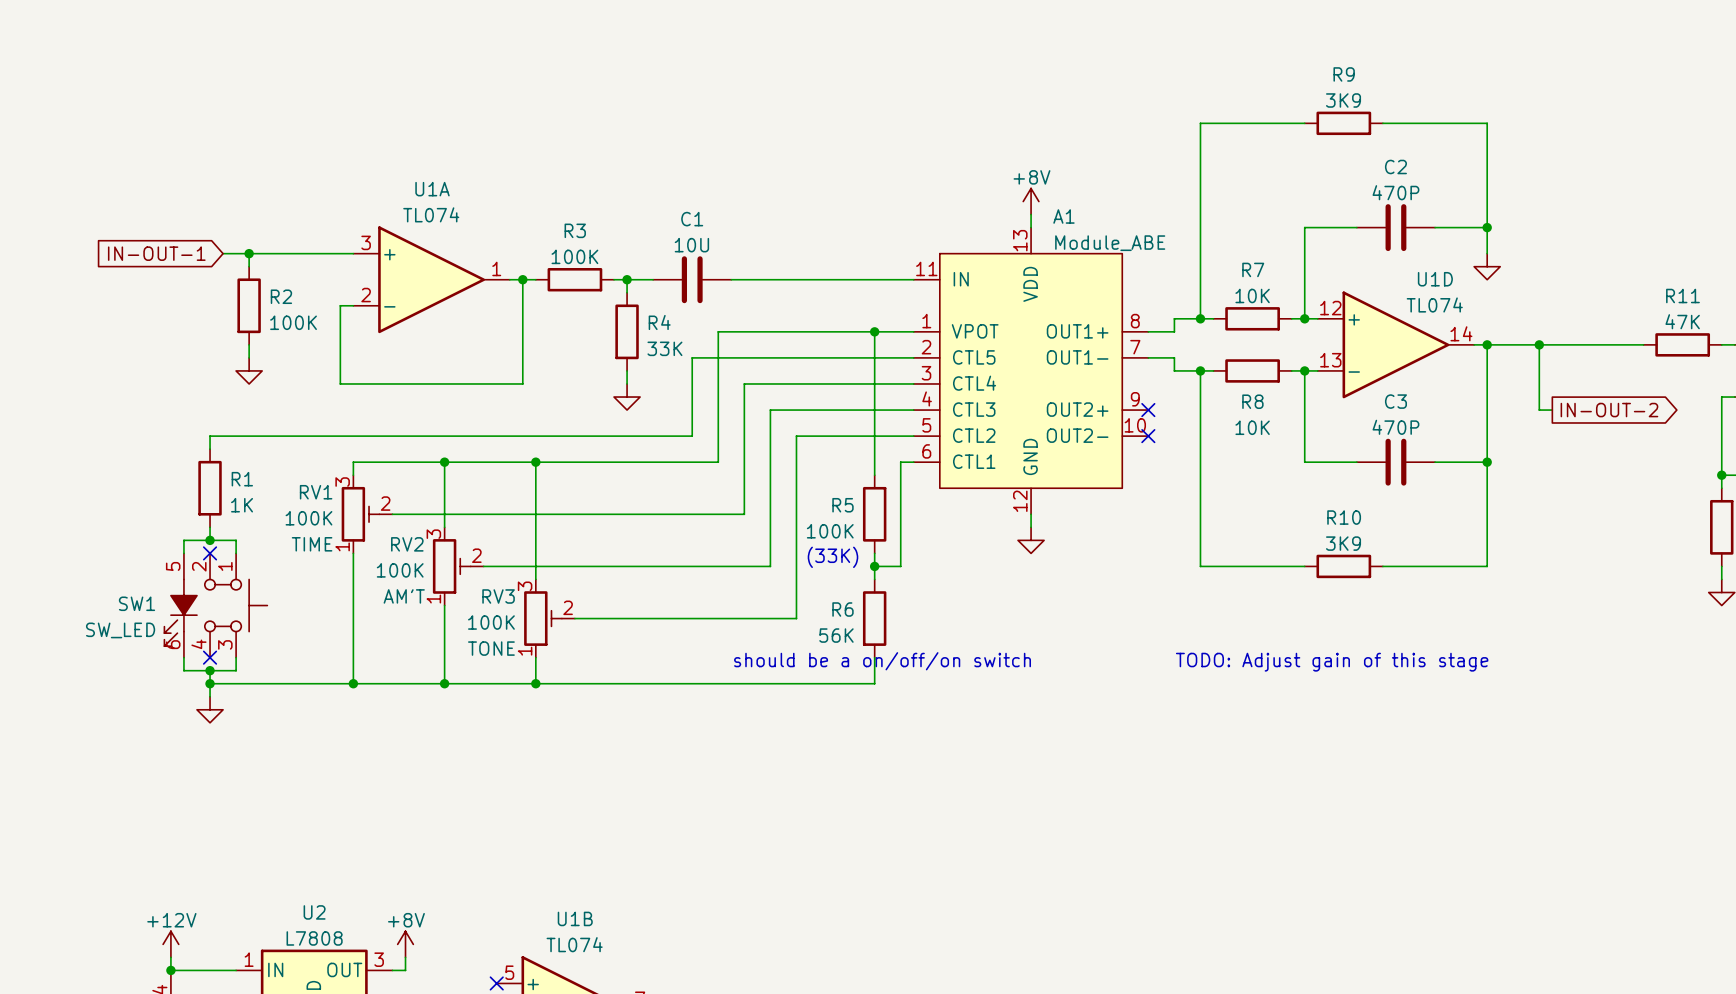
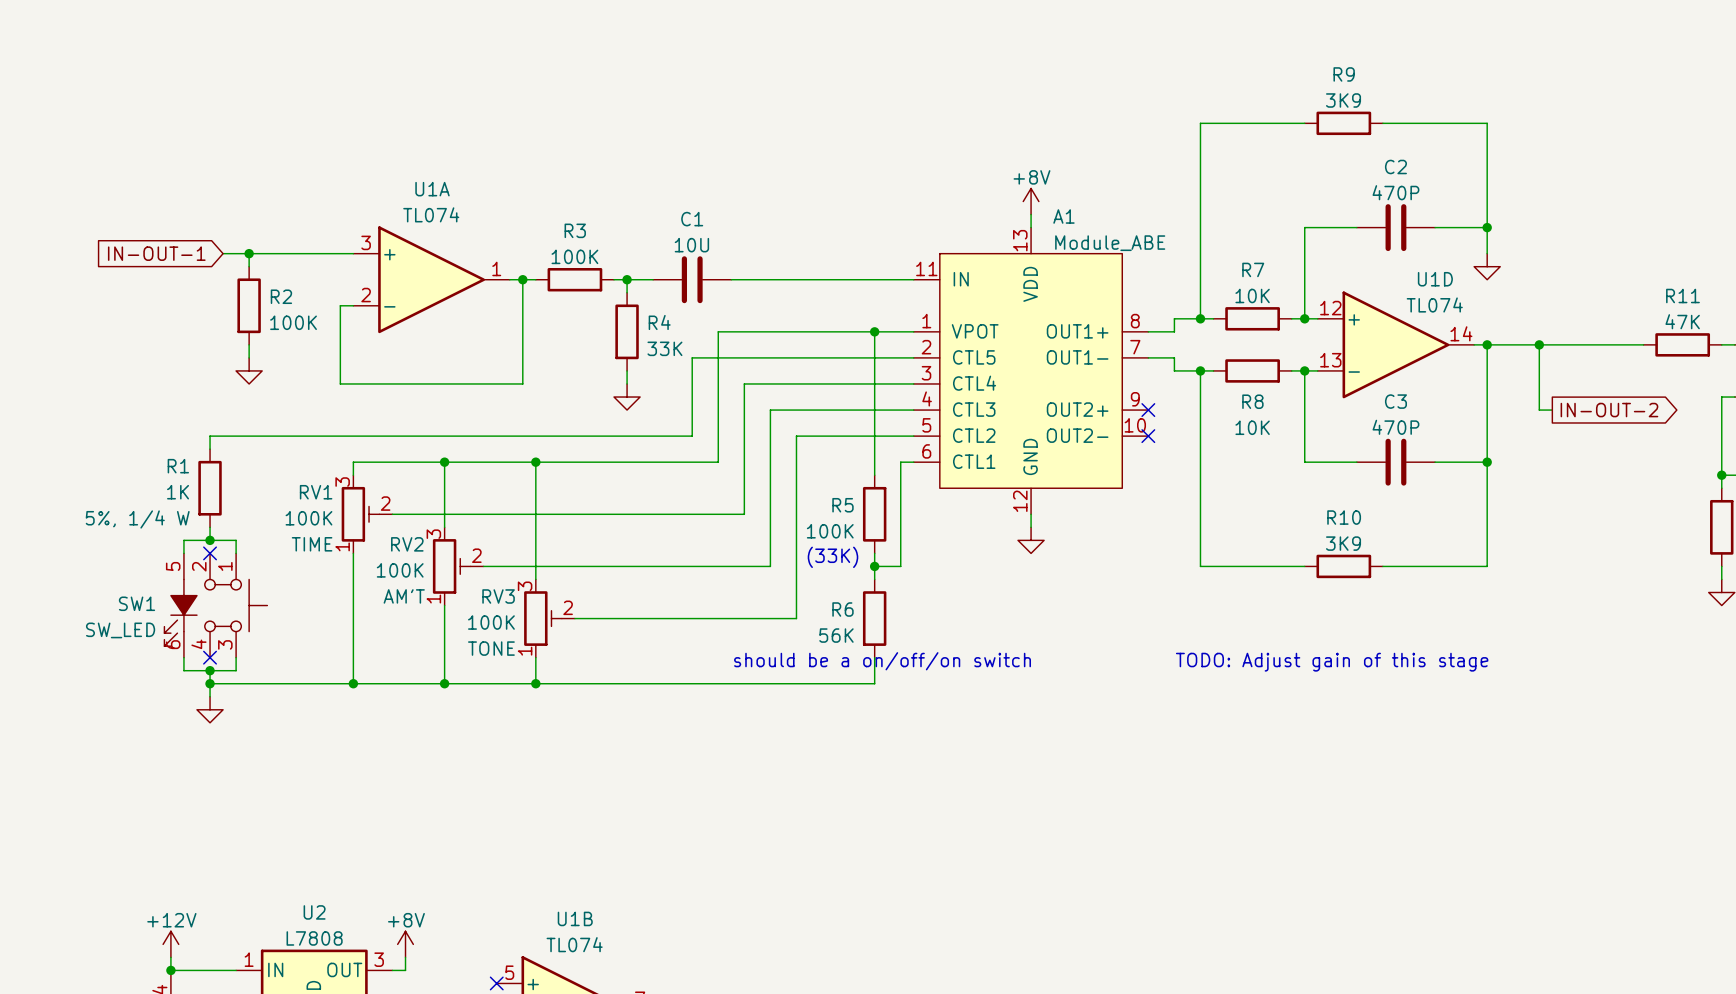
R1 name position: R1 (242, 479) -> R1 (178, 466)
R1 value position: 1K (242, 505) -> 1K (178, 492)
R1 text: none -> 5%, 1/4 W (137, 519)

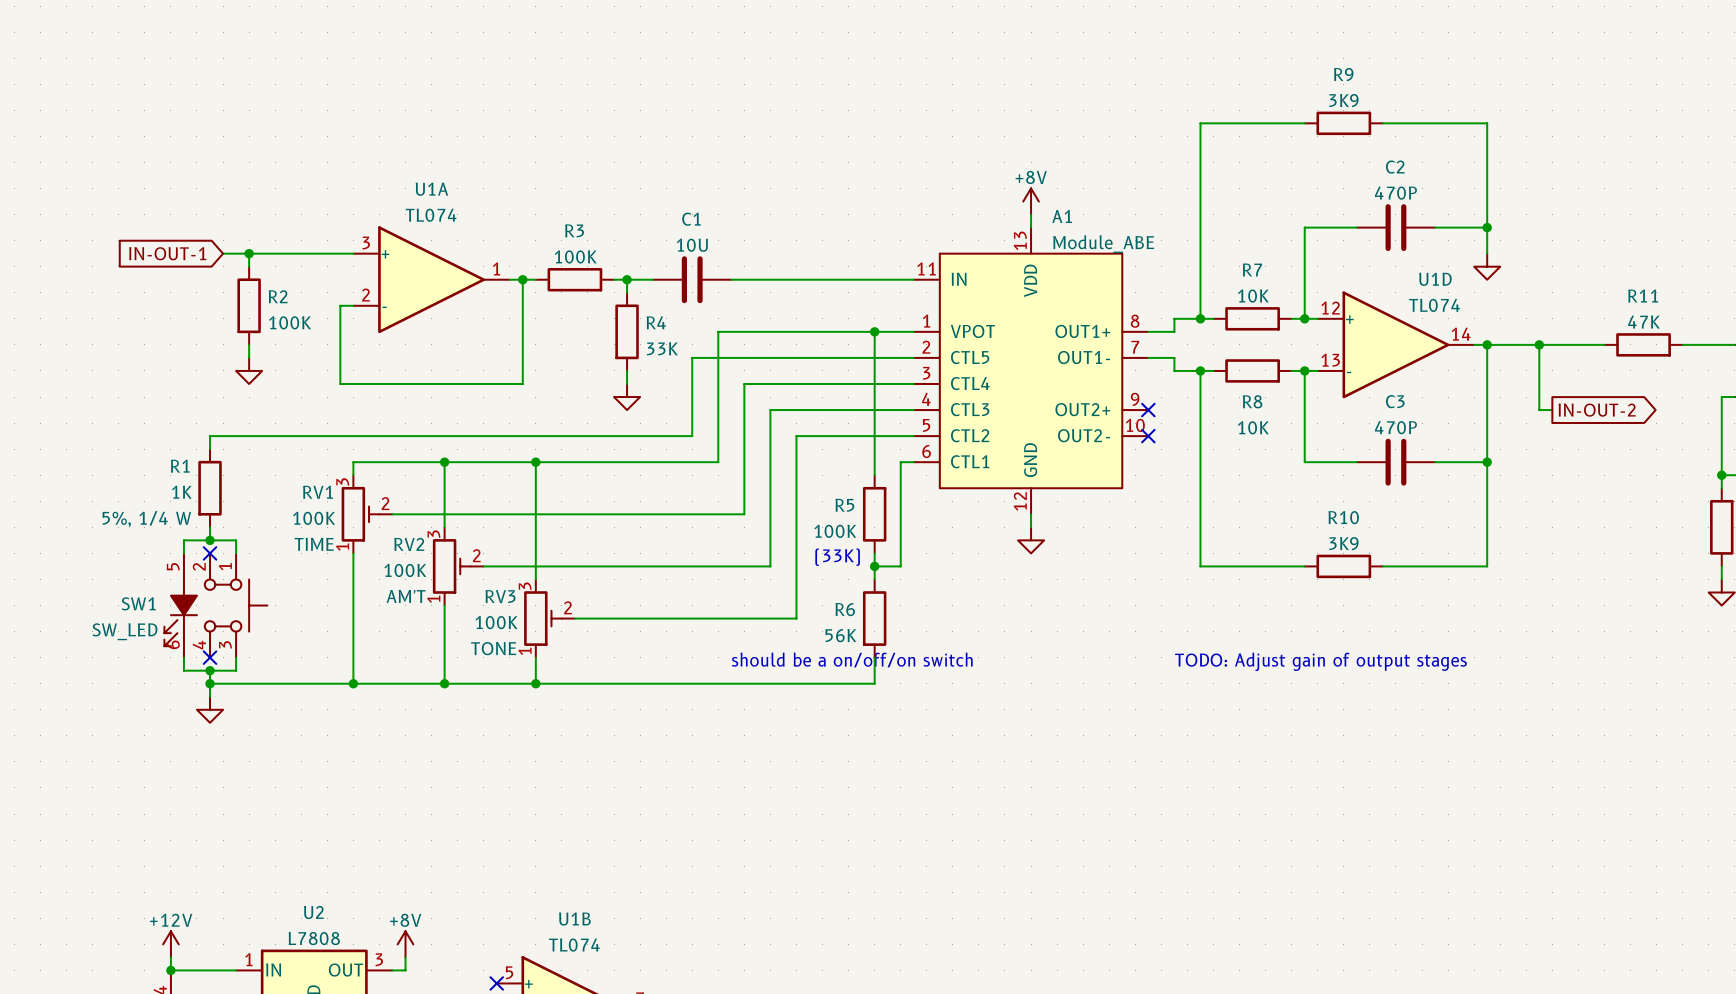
wire: (1604, 344) (1643, 344) -> (1682, 344) (1721, 344)
R11 position: (1682, 344) -> (1643, 344)
text: TODO: Adjust gain of this stage (1332, 662) -> TODO: Adjust gain of output stages (1320, 661)

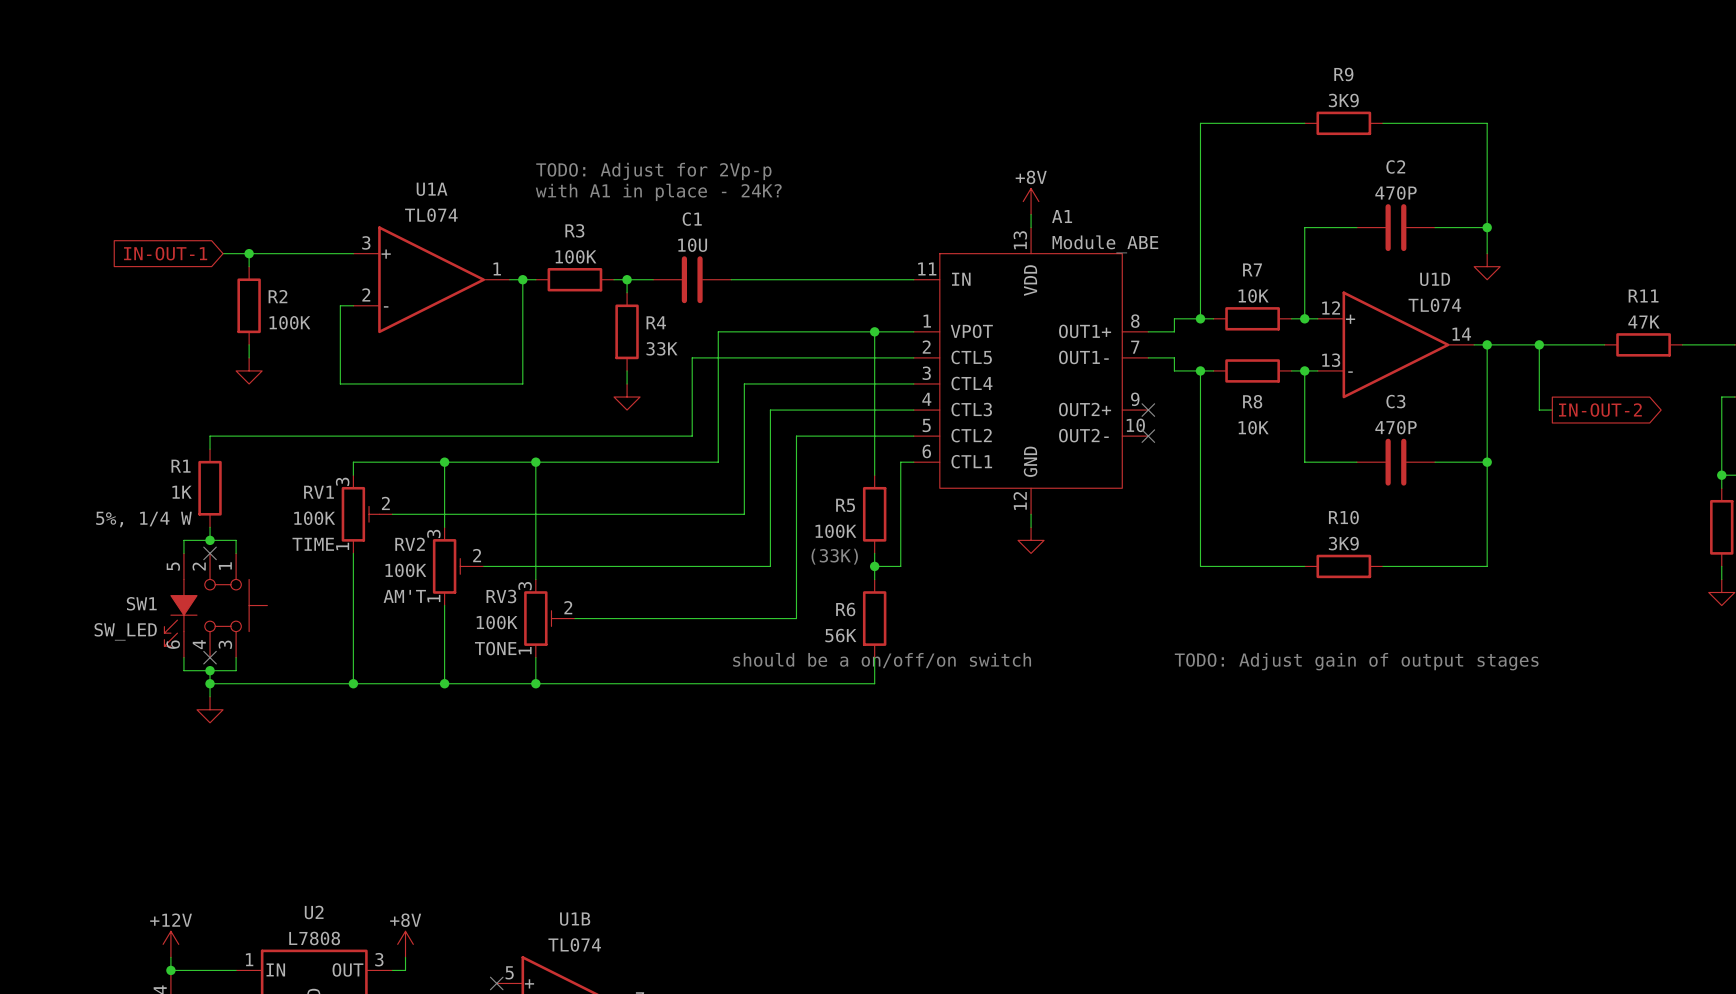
text: none -> TODO: Adjust for 2Vp-p (653, 171)
text: none -> with A1 in place - 24K? (658, 192)

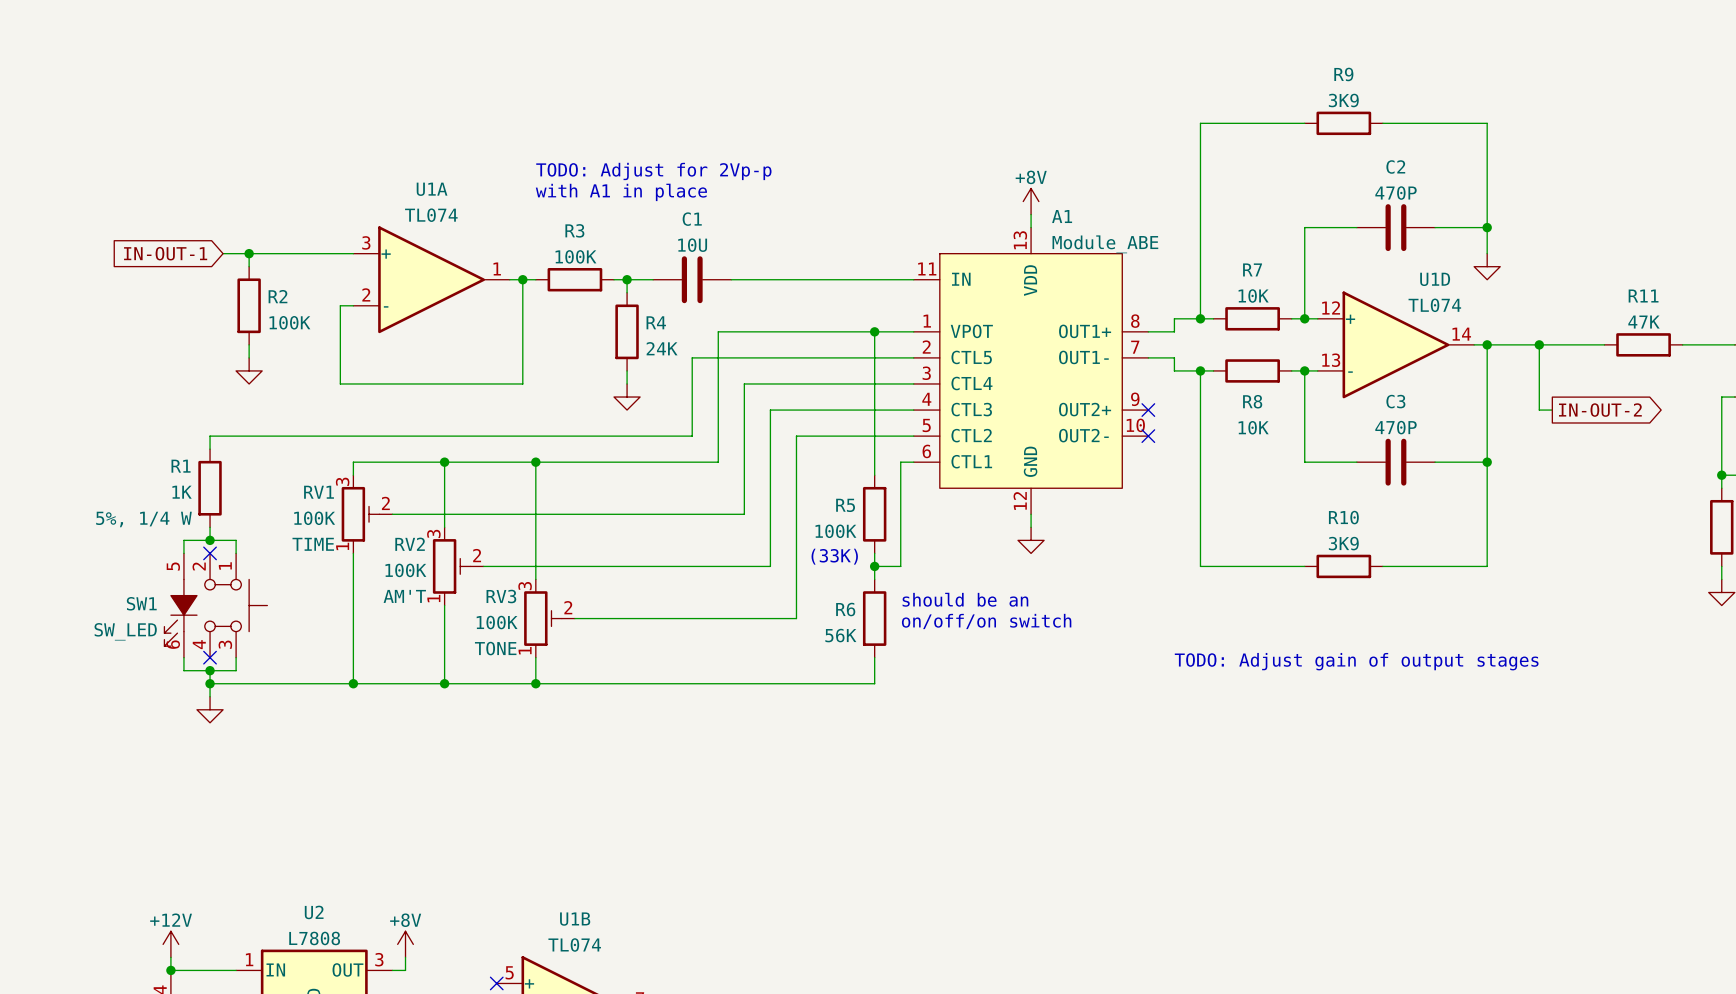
text: with A1 in place - 24K? (658, 192) -> with A1 in place (621, 192)
R4 value: 33K (662, 348) -> 24K (662, 348)
text: none -> should be an (965, 599)
text: none -> on/off/on switch (986, 621)
text: should be a on/off/on switch (882, 660) -> none

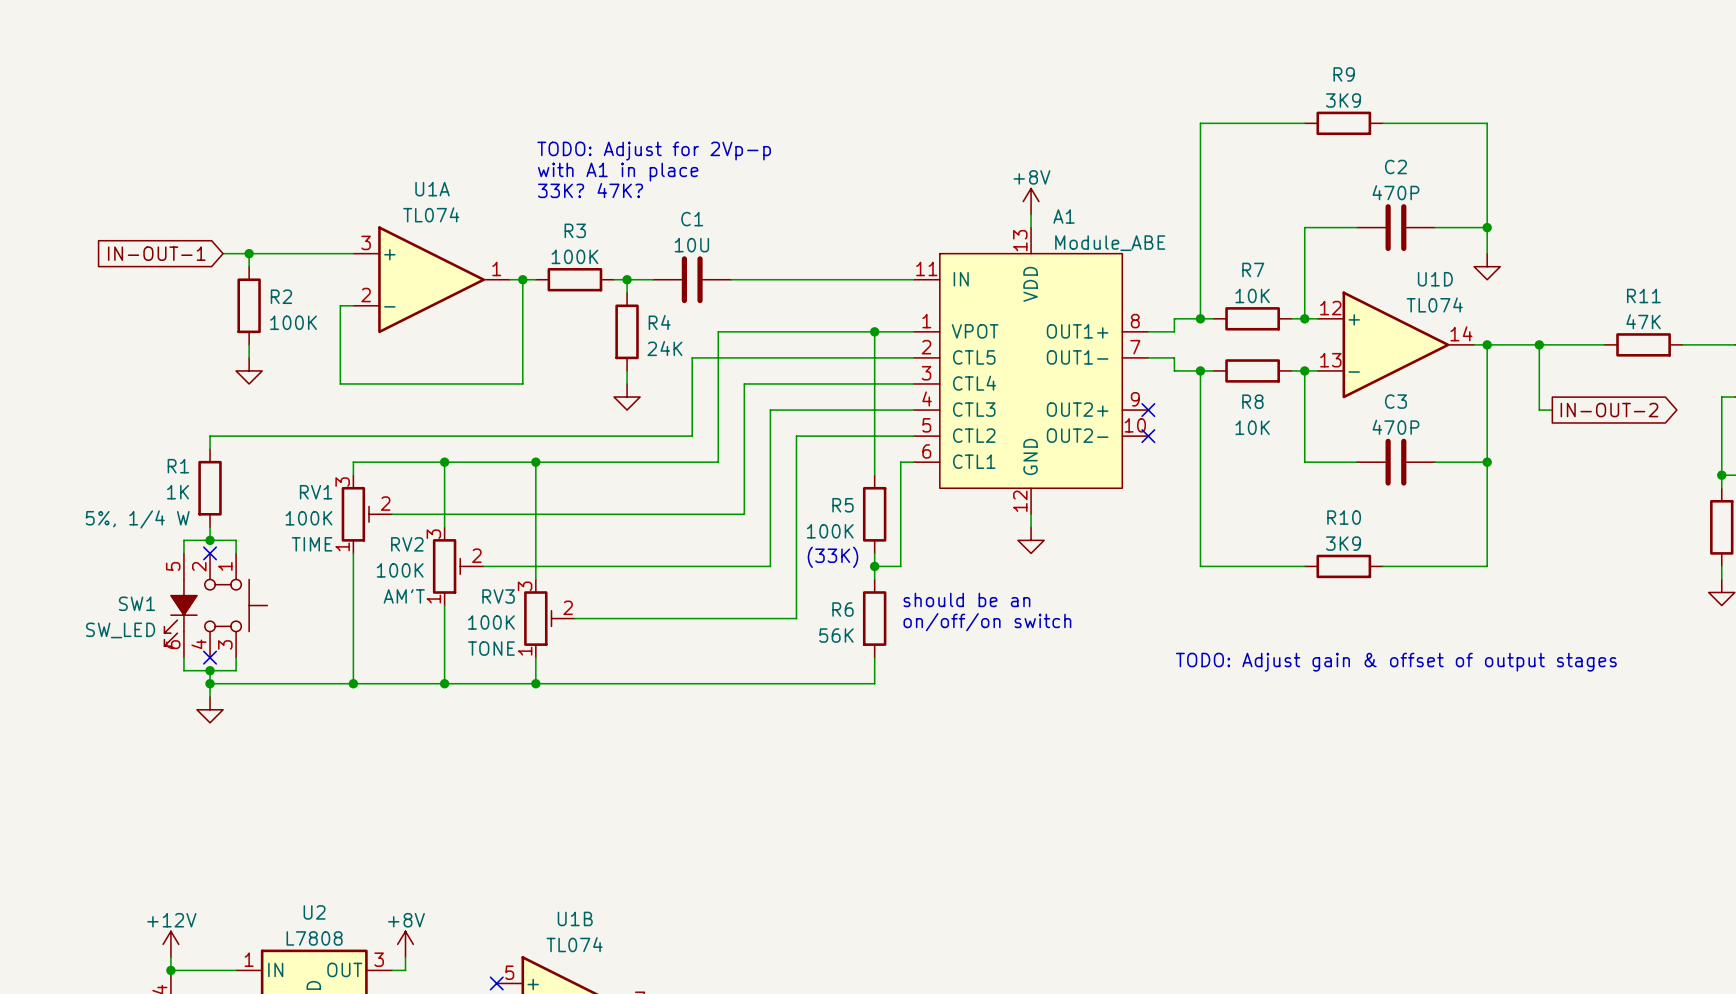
text: none -> TODO: Adjust for 2Vp-p (654, 151)
text: TODO: Adjust for 2Vp-p (653, 171) -> with A1 in place (618, 172)
text: with A1 in place (621, 192) -> 33K? 47K? (590, 190)
text: TODO: Adjust gain of output stages (1356, 661) -> TODO: Adjust gain & offset of output stages (1396, 662)

